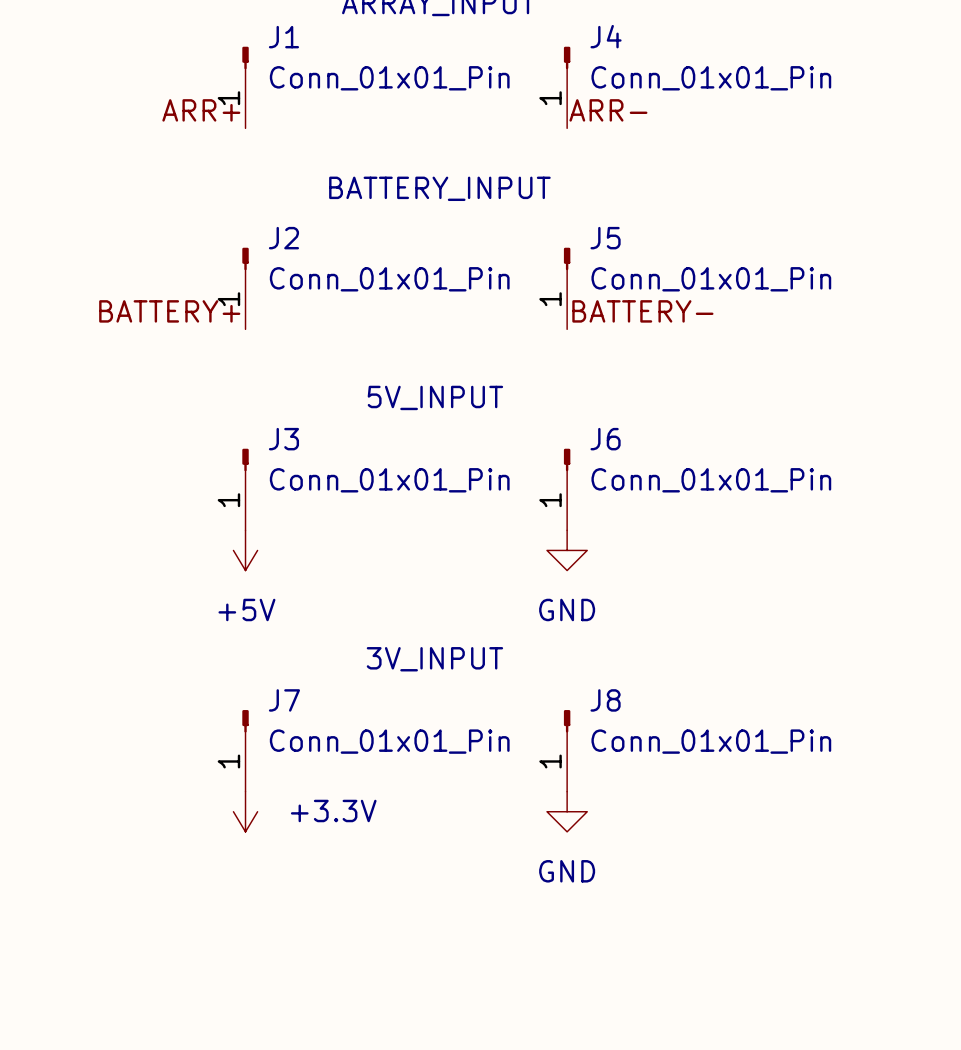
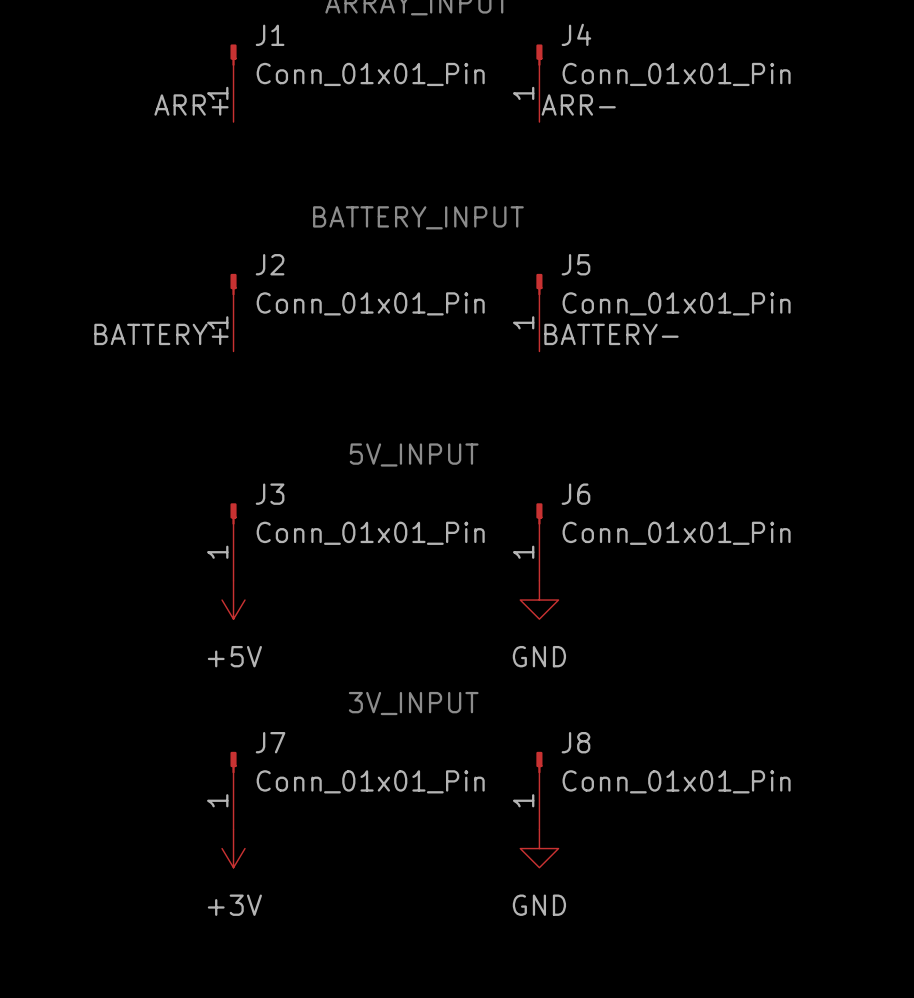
text position: BATTERY_INPUT (439, 188) -> BATTERY_INPUT (418, 217)
J2 position: (245, 288) -> (233, 312)
J5 position: (567, 288) -> (539, 312)
label position: BATTERY+ (169, 311) -> BATTERY+ (161, 334)
label position: BATTERY- (642, 311) -> BATTERY- (611, 334)
text position: 5V_INPUT (435, 397) -> 5V_INPUT (414, 454)
J3 position: (245, 489) -> (233, 542)
J6 position: (567, 489) -> (539, 542)
power symbol position: +5V (245, 550) -> +5V (233, 600)
power symbol position: GND (567, 550) -> GND (539, 600)
text position: 3V_INPUT (434, 659) -> 3V_INPUT (413, 703)
J7 position: (245, 750) -> (233, 790)
J8 position: (567, 750) -> (539, 790)
power symbol: +3.3V (245, 811) -> none
power symbol position: GND (567, 811) -> GND (539, 848)
power symbol: none -> +3V (233, 848)

